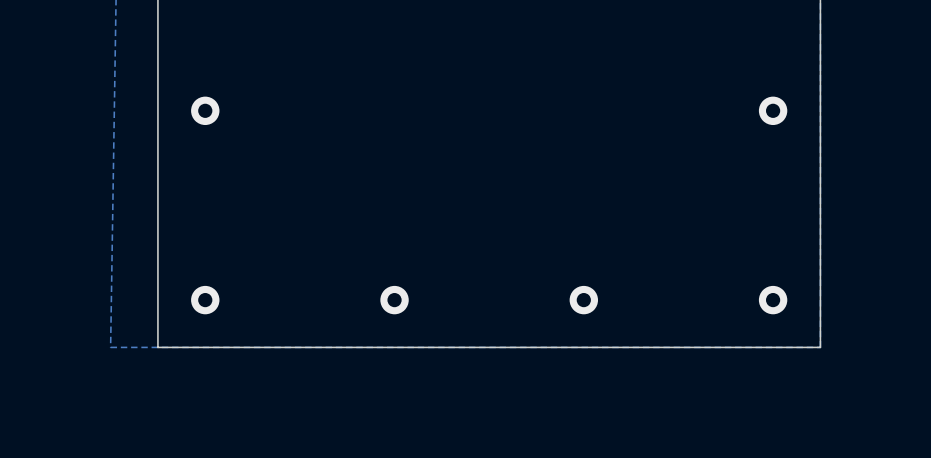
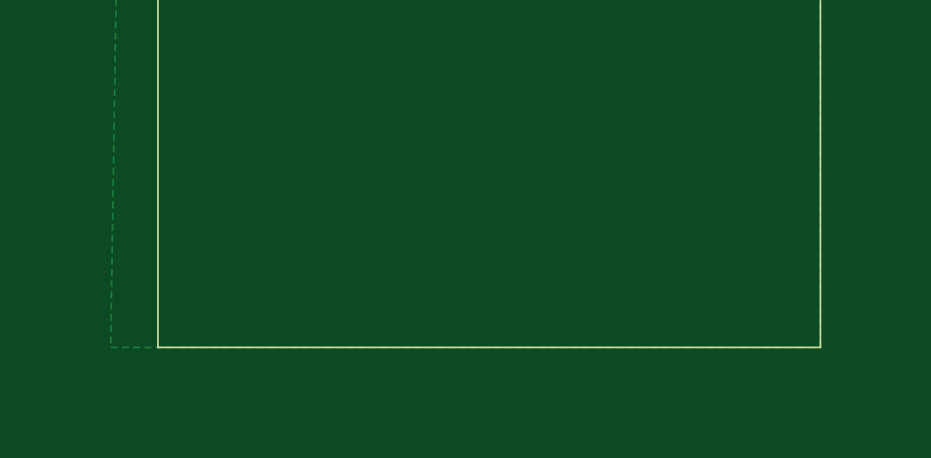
via: (205, 110) -> none
via: (773, 110) -> none
via: (205, 300) -> none
via: (394, 300) -> none
via: (583, 300) -> none
via: (773, 300) -> none

